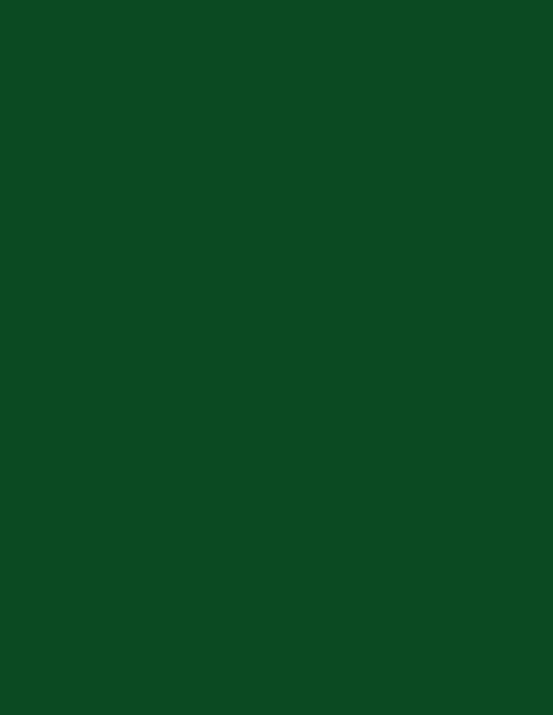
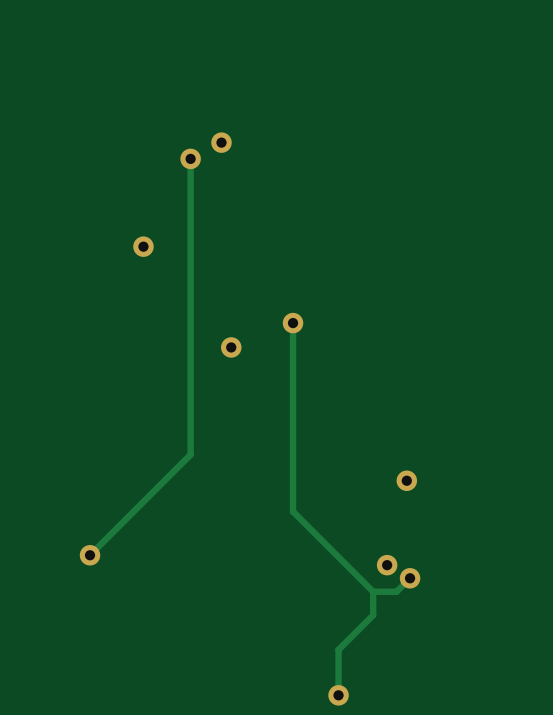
via: none -> (221, 142)
track: none -> (190, 158) (190, 454) (90, 555)
via: none -> (190, 158)
via: none -> (143, 246)
track: none -> (293, 323) (293, 511) (373, 591)
via: none -> (293, 323)
via: none -> (231, 347)
via: none -> (406, 480)
via: none -> (90, 555)
via: none -> (387, 565)
track: none -> (410, 578) (396, 591) (373, 591)
via: none -> (410, 578)
track: none -> (373, 591) (373, 615) (338, 649) (338, 695)
via: none -> (338, 695)

